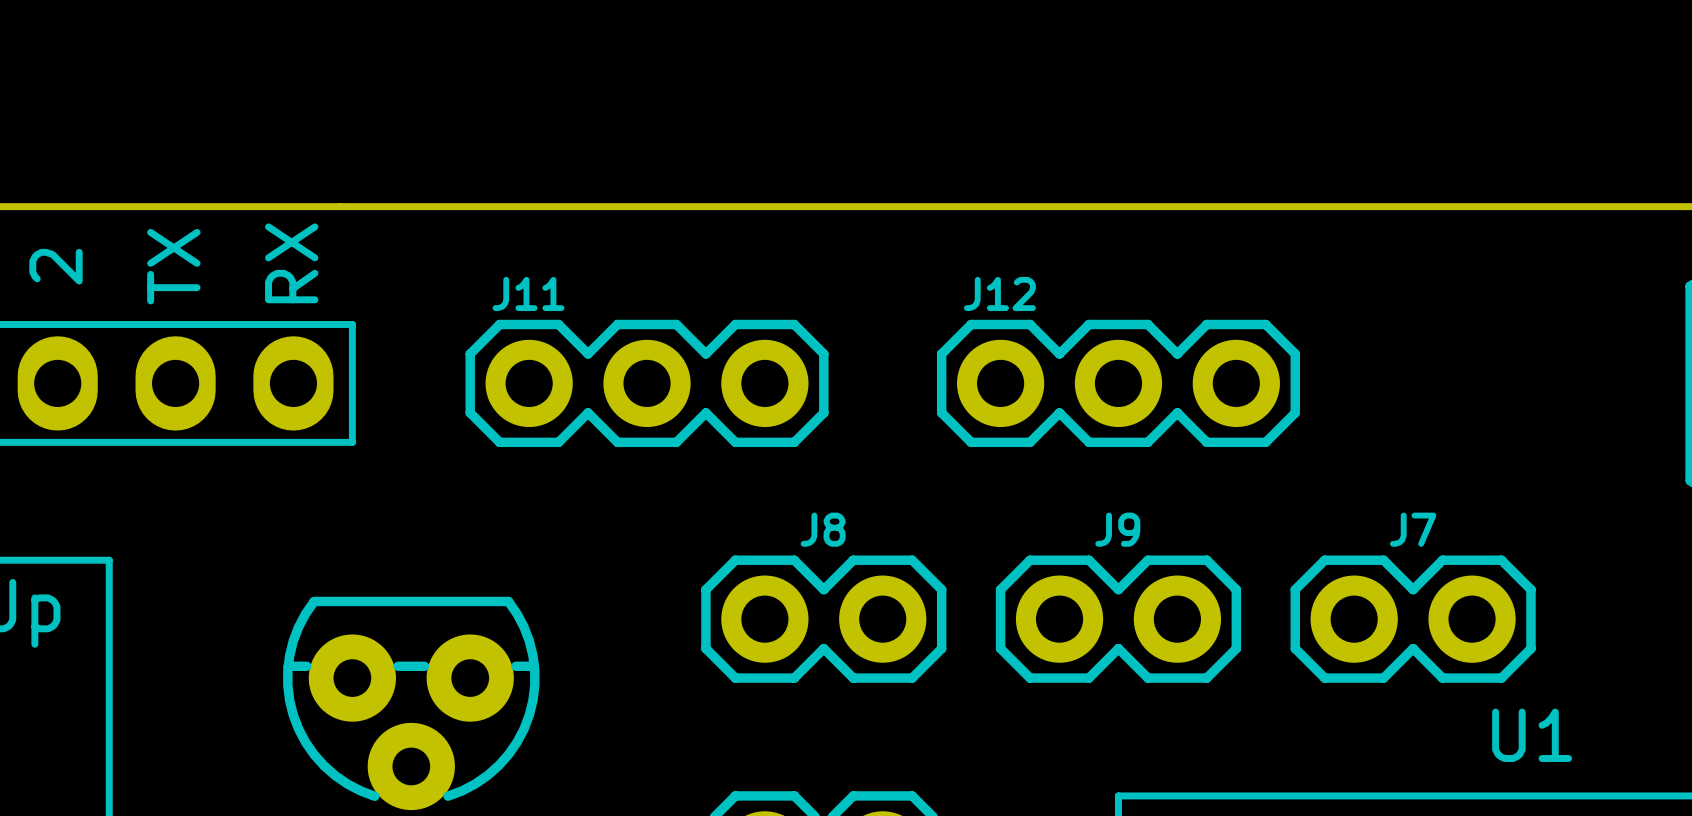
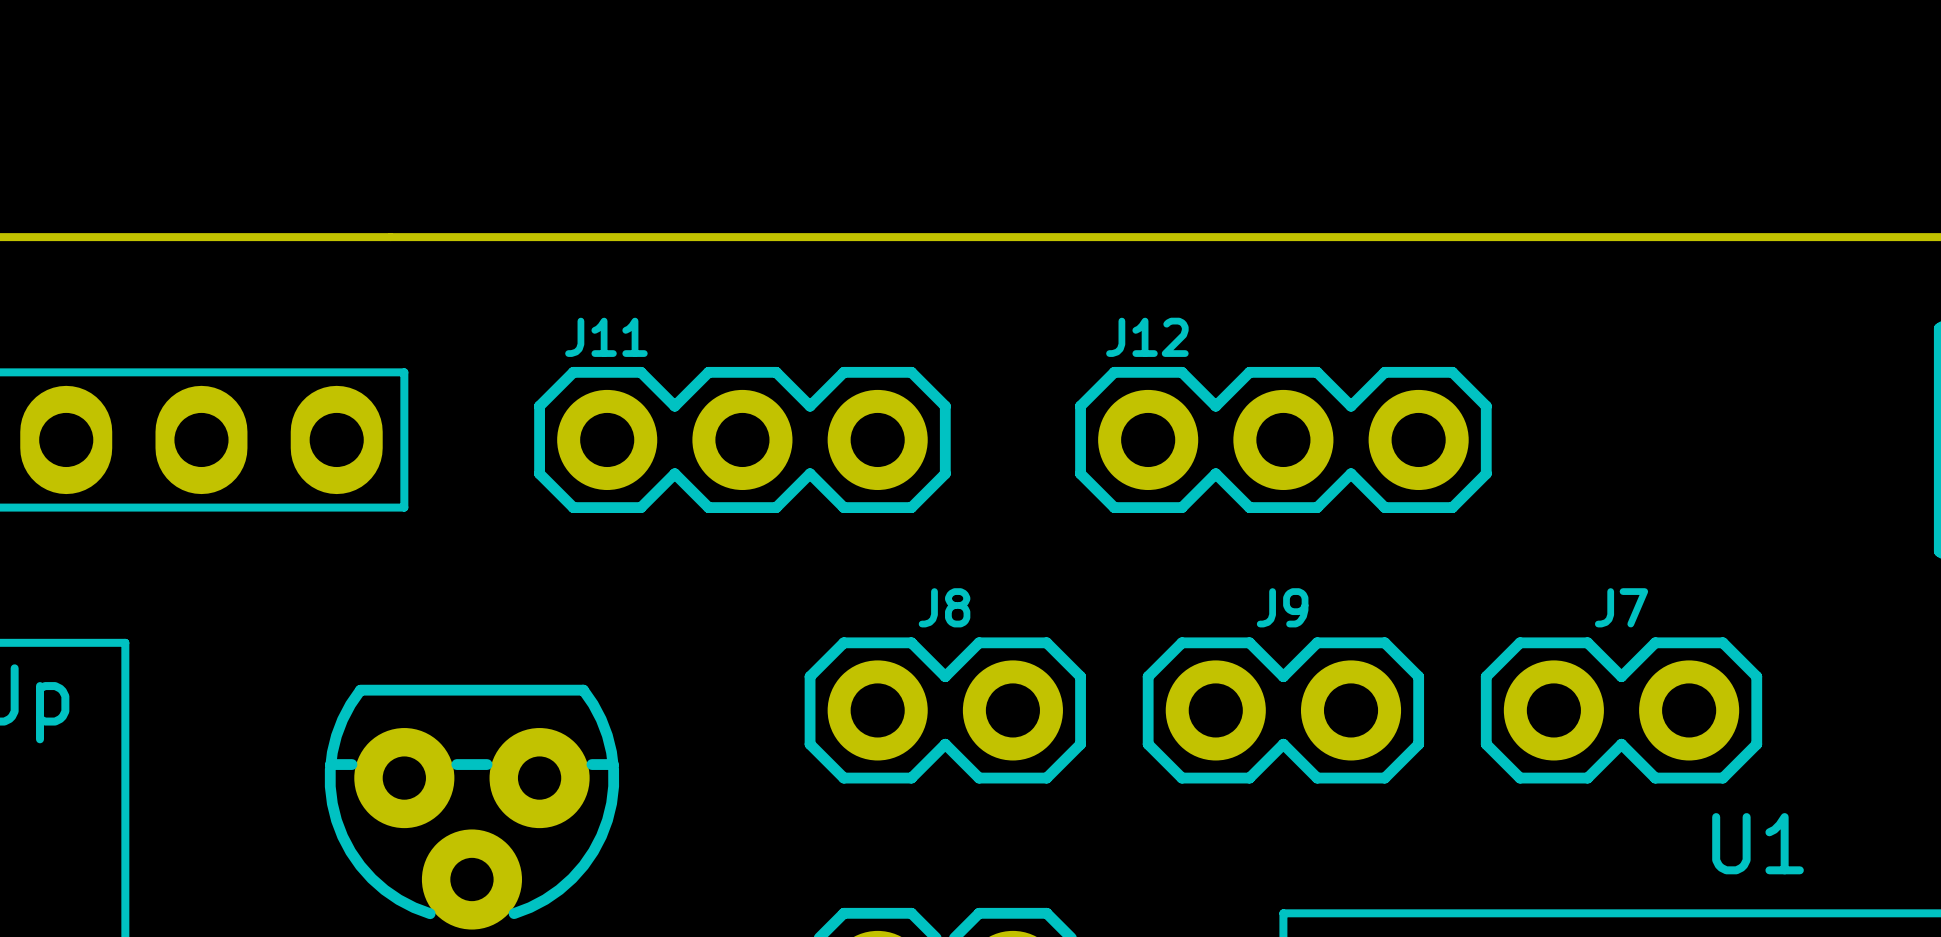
part text: RX (291, 263) -> none
part text: 2 (55, 266) -> none
part text: TX (173, 266) -> none

